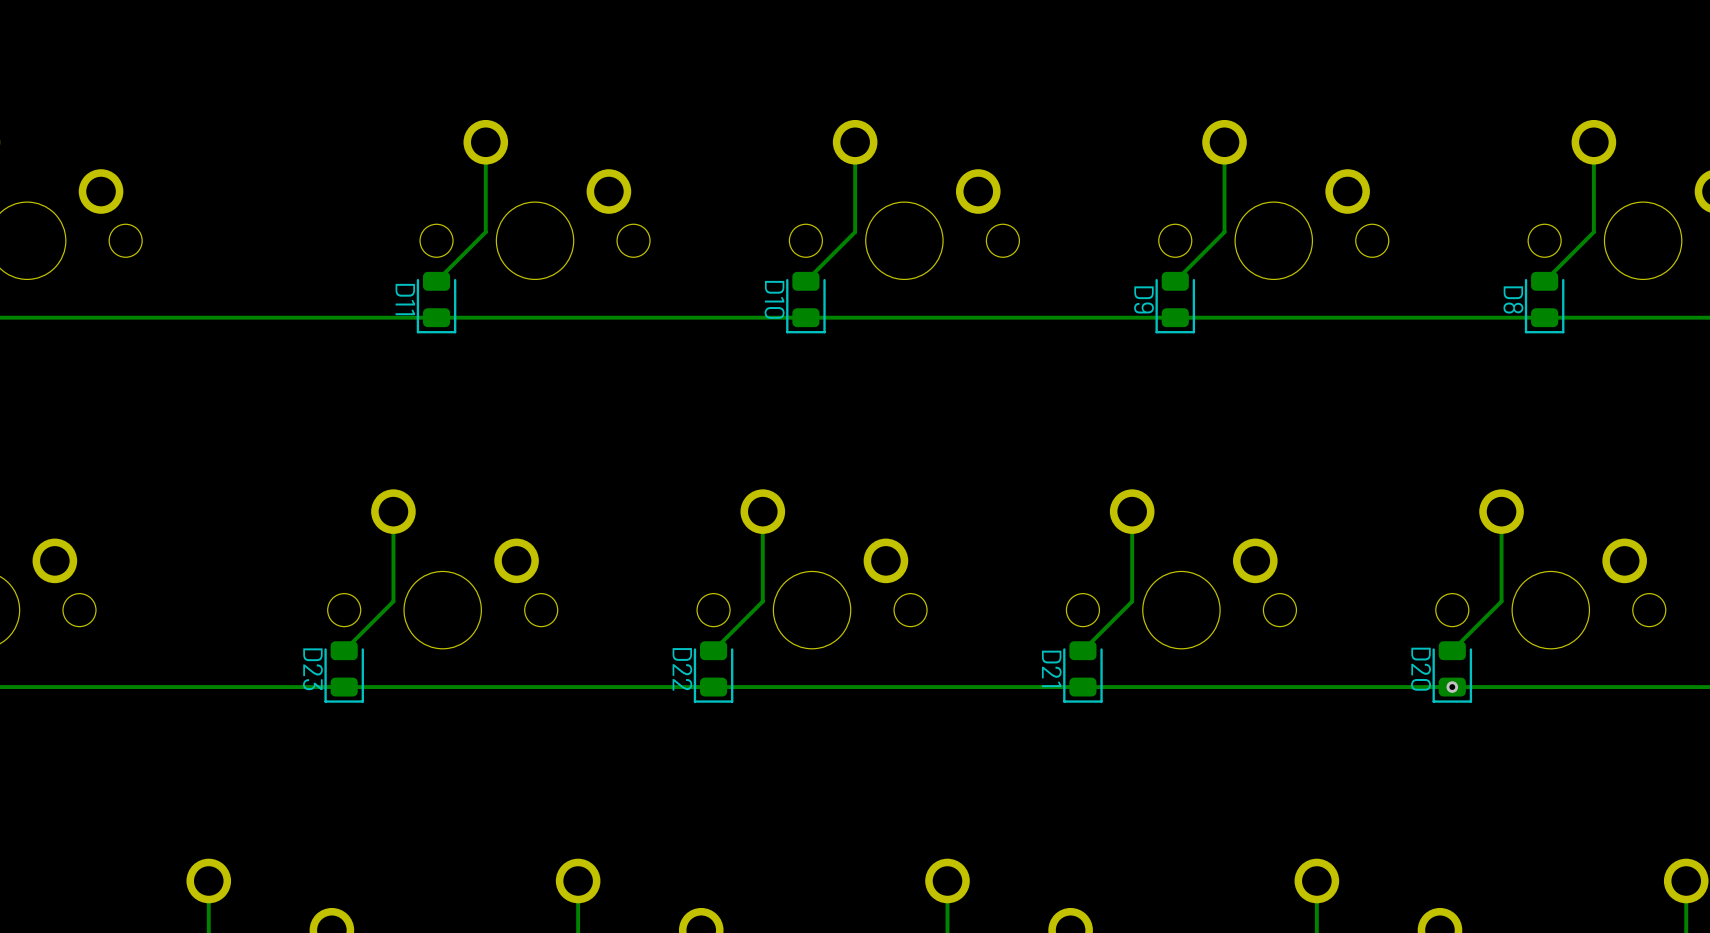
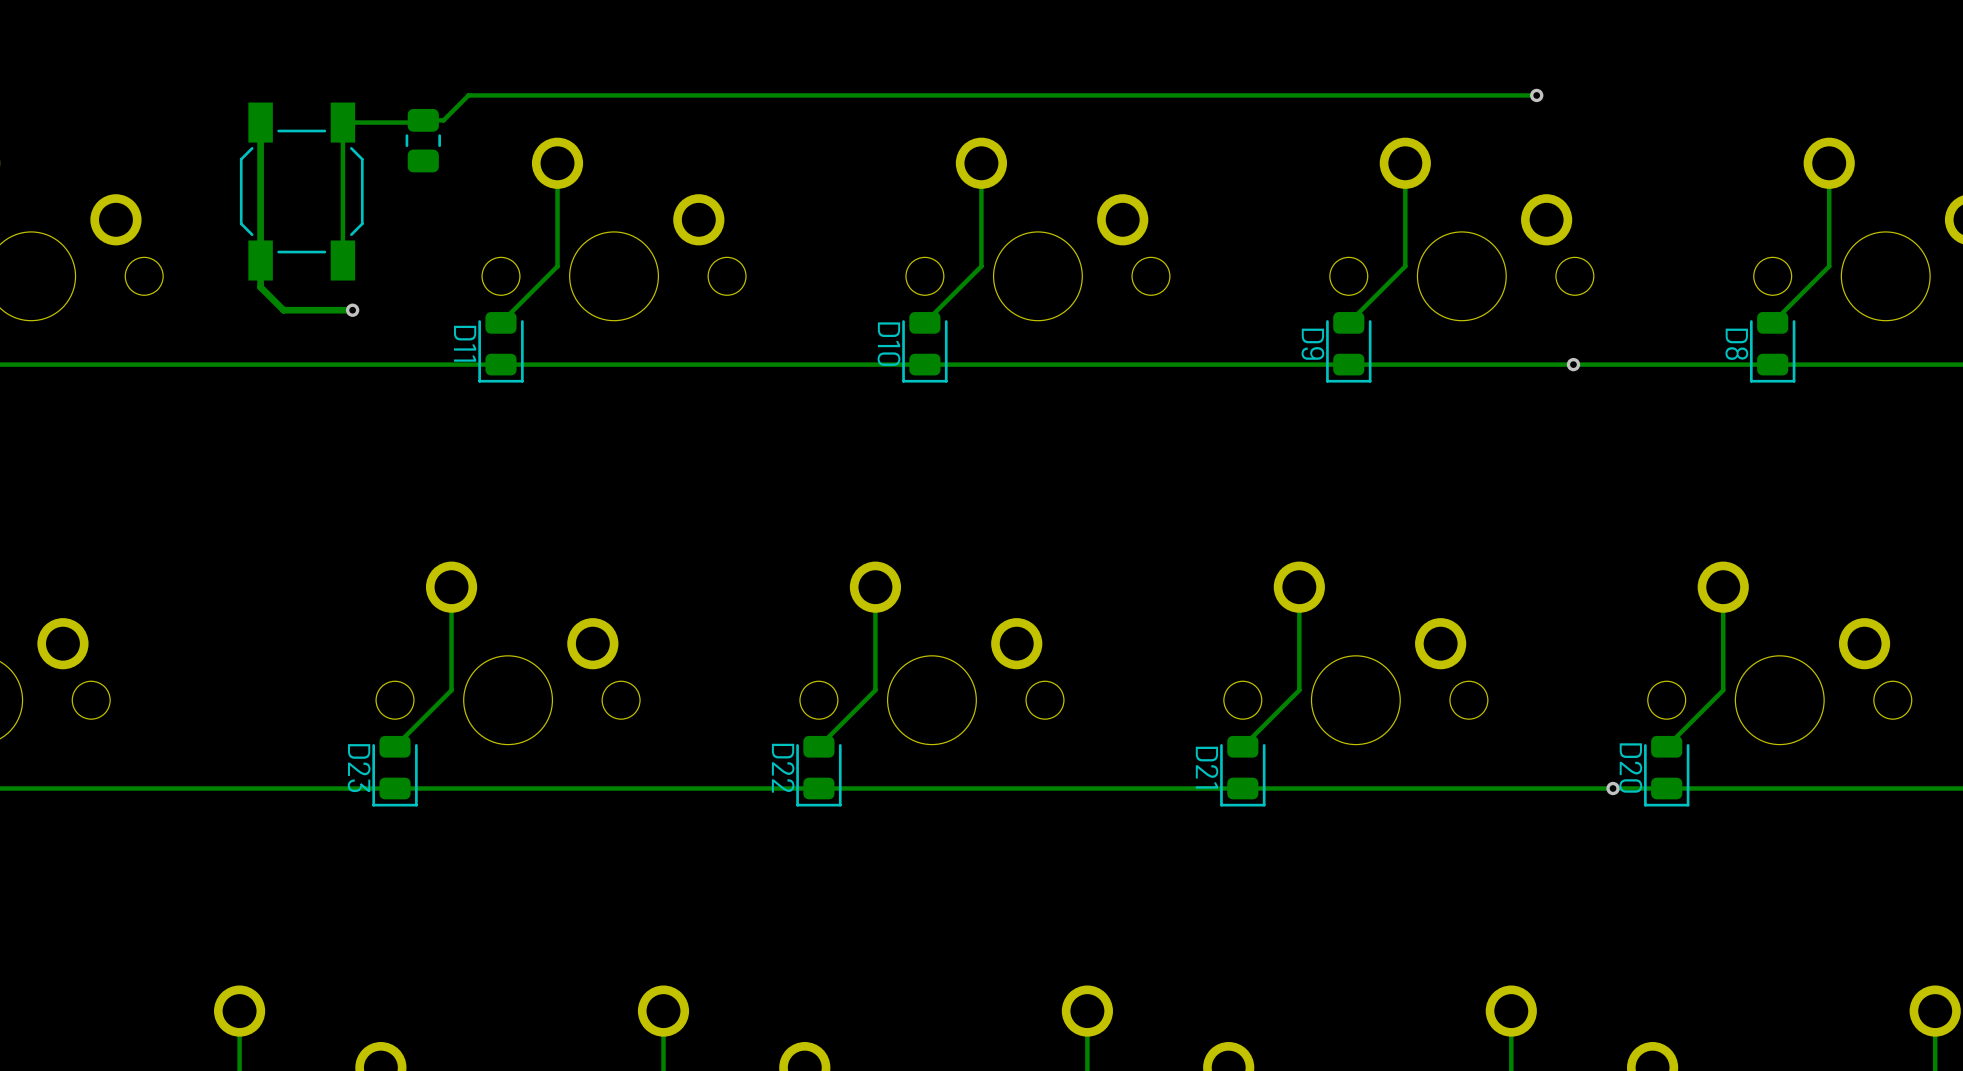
track: none -> (1536, 95) (468, 95) (443, 120) (423, 120) (421, 122) (342, 122) (342, 260)
via: none -> (1536, 95)
track: none -> (260, 122) (260, 287) (283, 310) (352, 310)
part: none -> (423, 140)
part: none -> (301, 191)
via: none -> (352, 310)
via: none -> (1573, 364)
via position: (1452, 687) -> (1613, 788)

